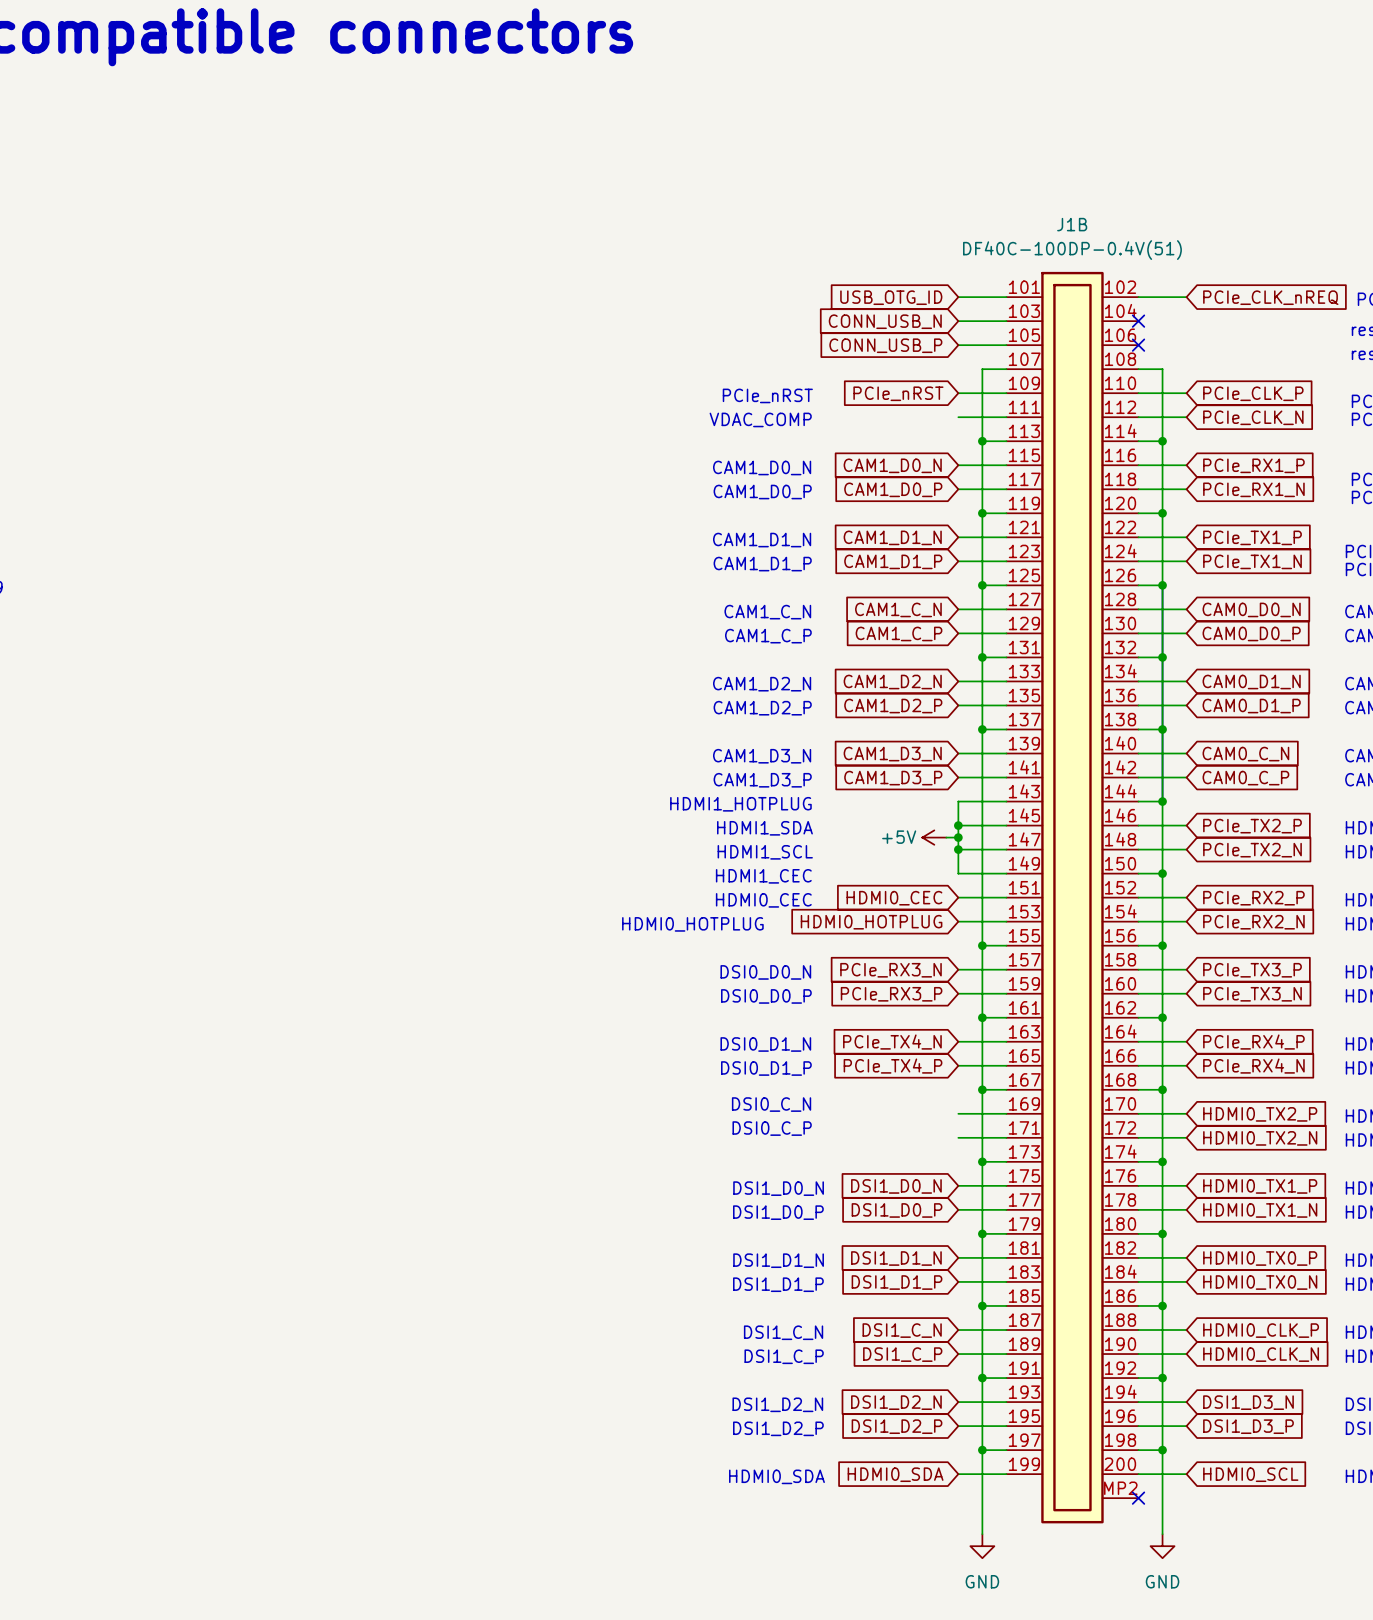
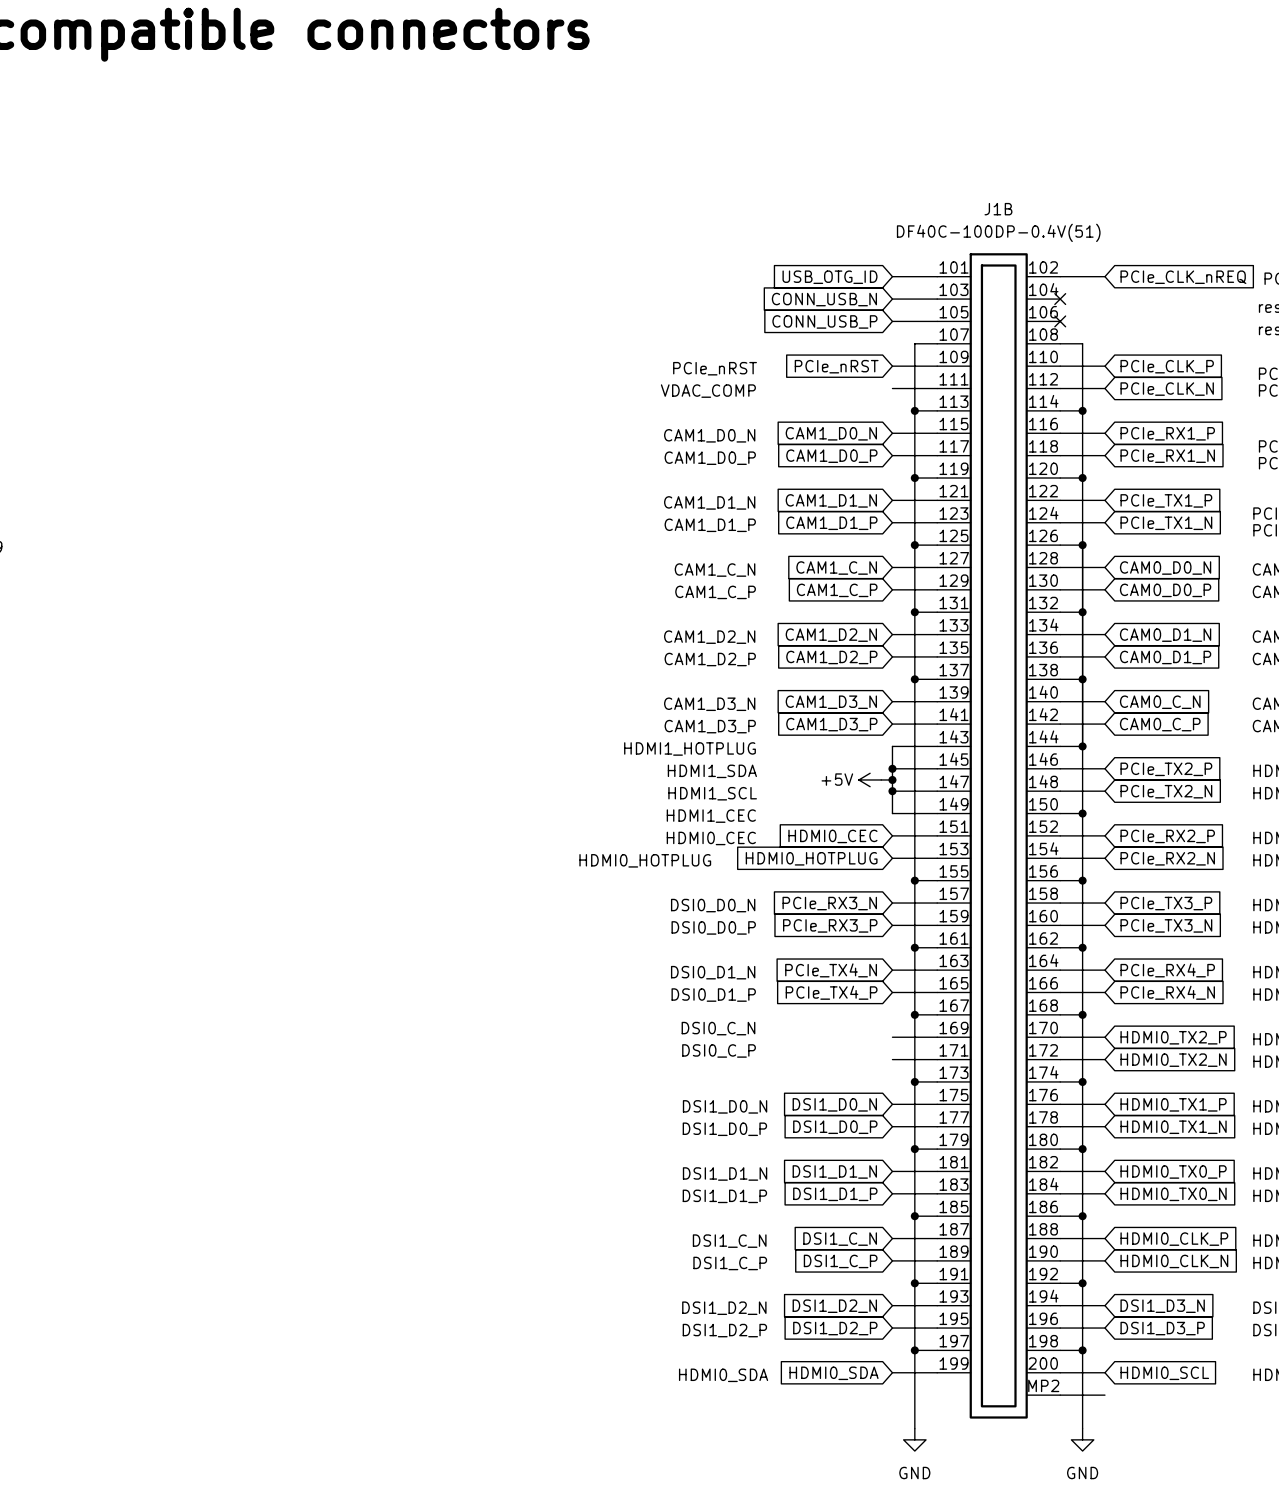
wire: none -> (1060, 1395) (1104, 1395)
no-connect mark: (1138, 1498) -> none

